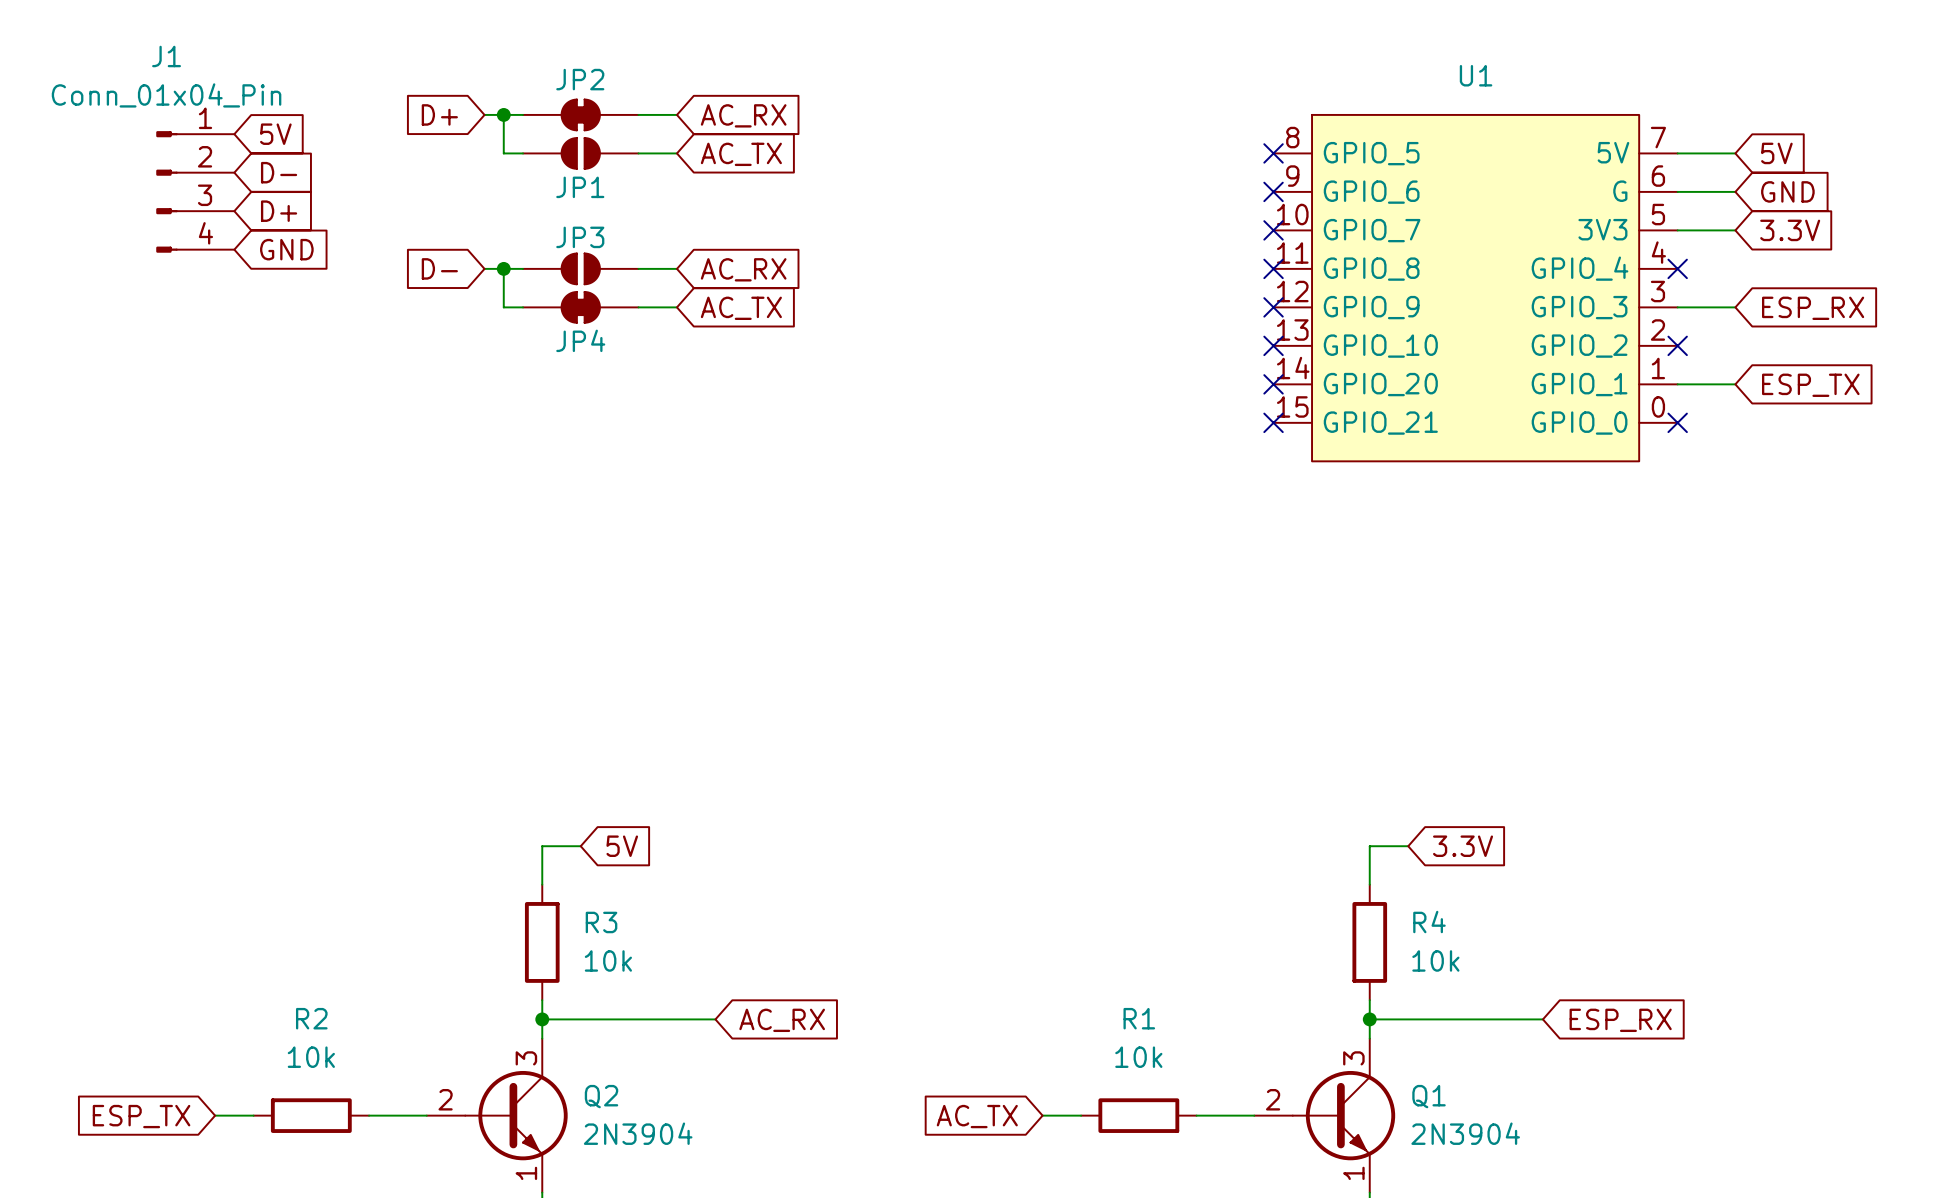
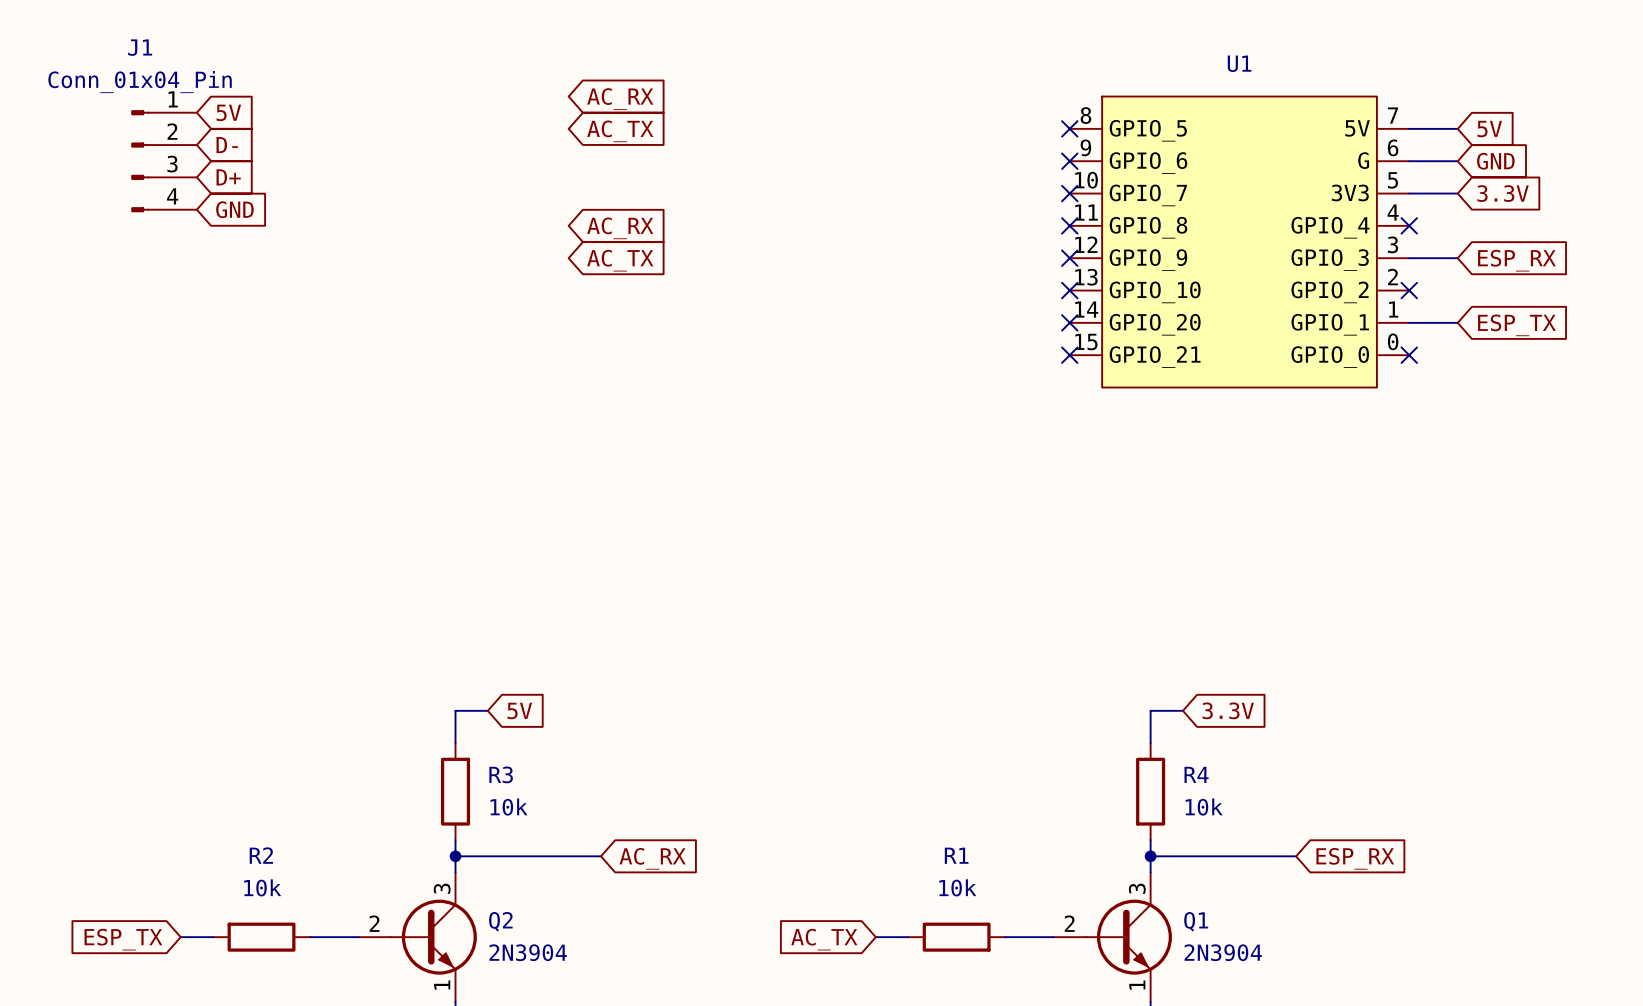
global label: D+ (439, 114) -> none
wire: (484, 114) (523, 114) -> none
wire: (503, 114) (503, 153) (523, 153) -> none
junction: (503, 114) -> none
JP2: (580, 114) -> none
wire: (638, 114) (676, 114) -> none
JP1: (580, 153) -> none
wire: (638, 153) (676, 153) -> none
global label: D- (439, 268) -> none
wire: (484, 268) (523, 268) -> none
wire: (503, 268) (503, 307) (523, 307) -> none
junction: (503, 268) -> none
JP3: (580, 268) -> none
wire: (638, 268) (676, 268) -> none
JP4: (580, 307) -> none
wire: (638, 307) (676, 307) -> none

